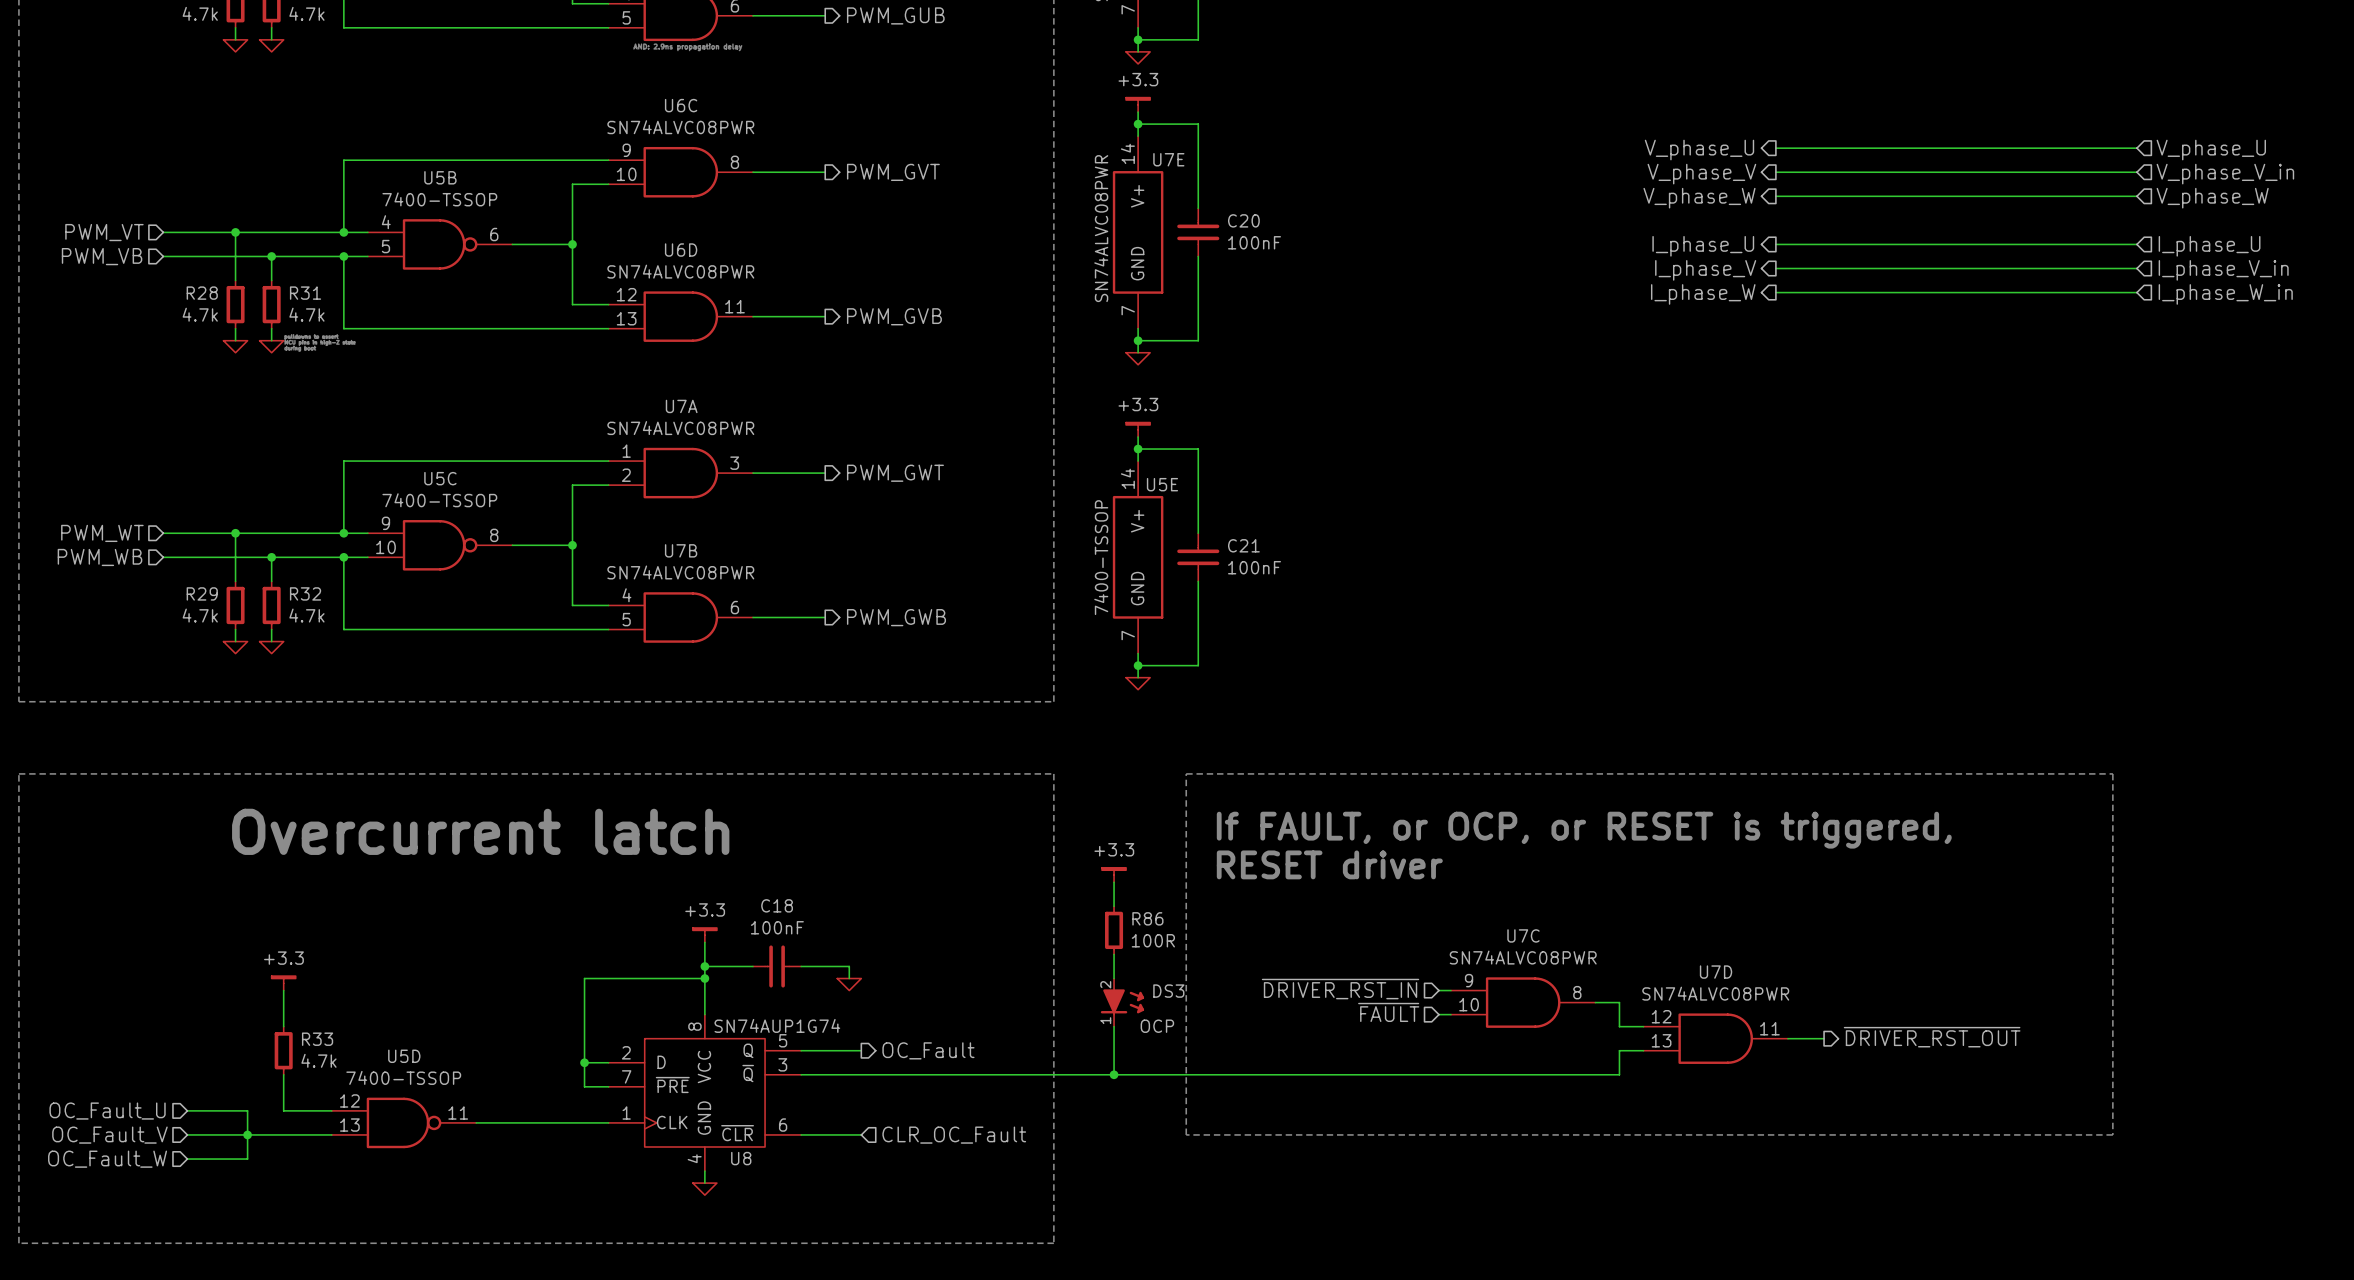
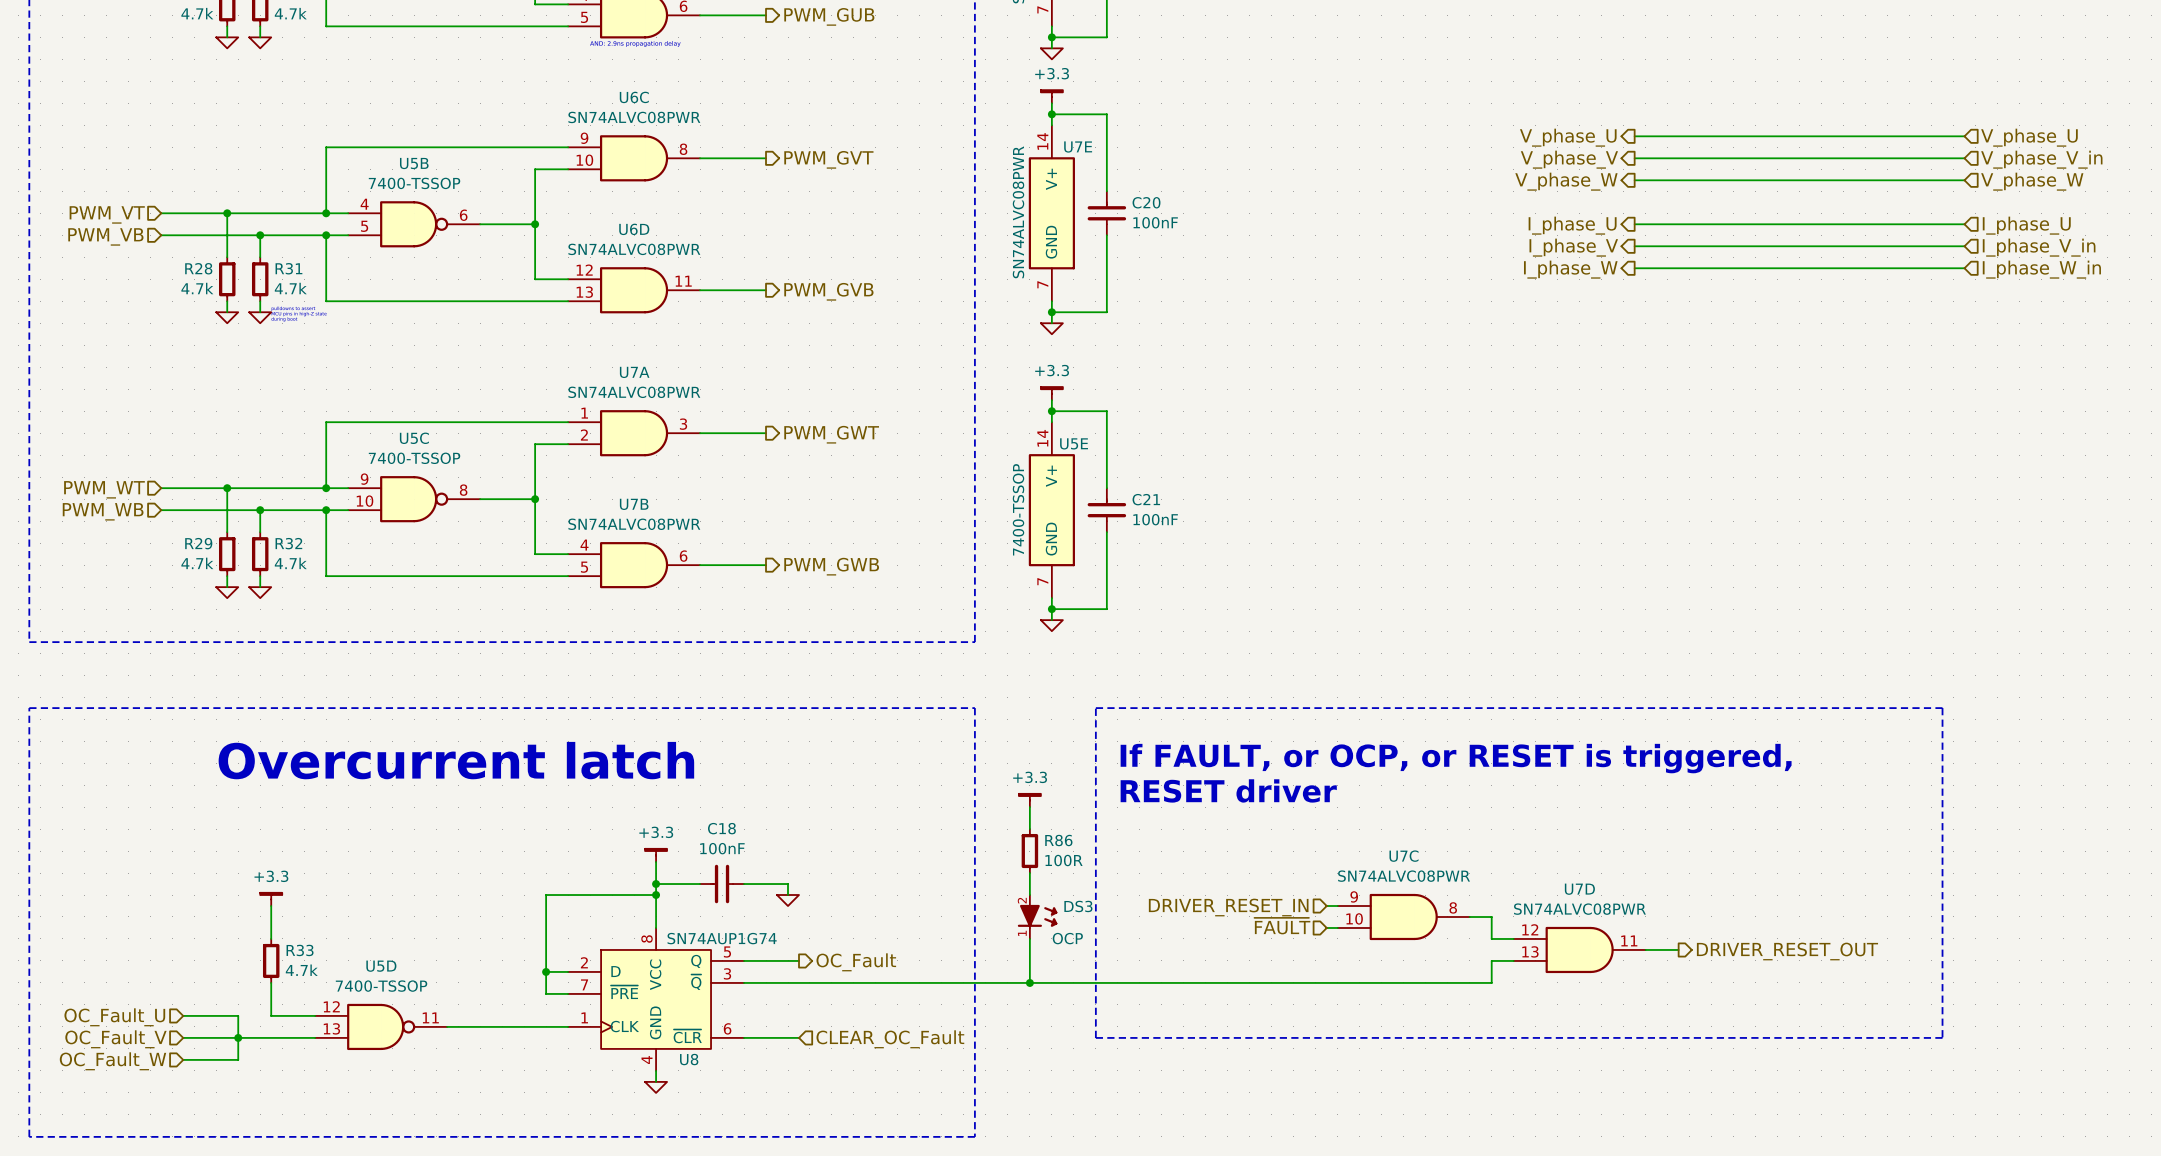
hierarchical label: ~{DRIVER_RST_IN} (1340, 989) -> DRIVER_RESET_IN (1228, 907)
hierarchical label: ~{DRIVER_RST_OUT} (1932, 1037) -> DRIVER_RESET_OUT (1787, 951)
hierarchical label: CLR_OC_Fault (954, 1135) -> CLEAR_OC_Fault (890, 1039)

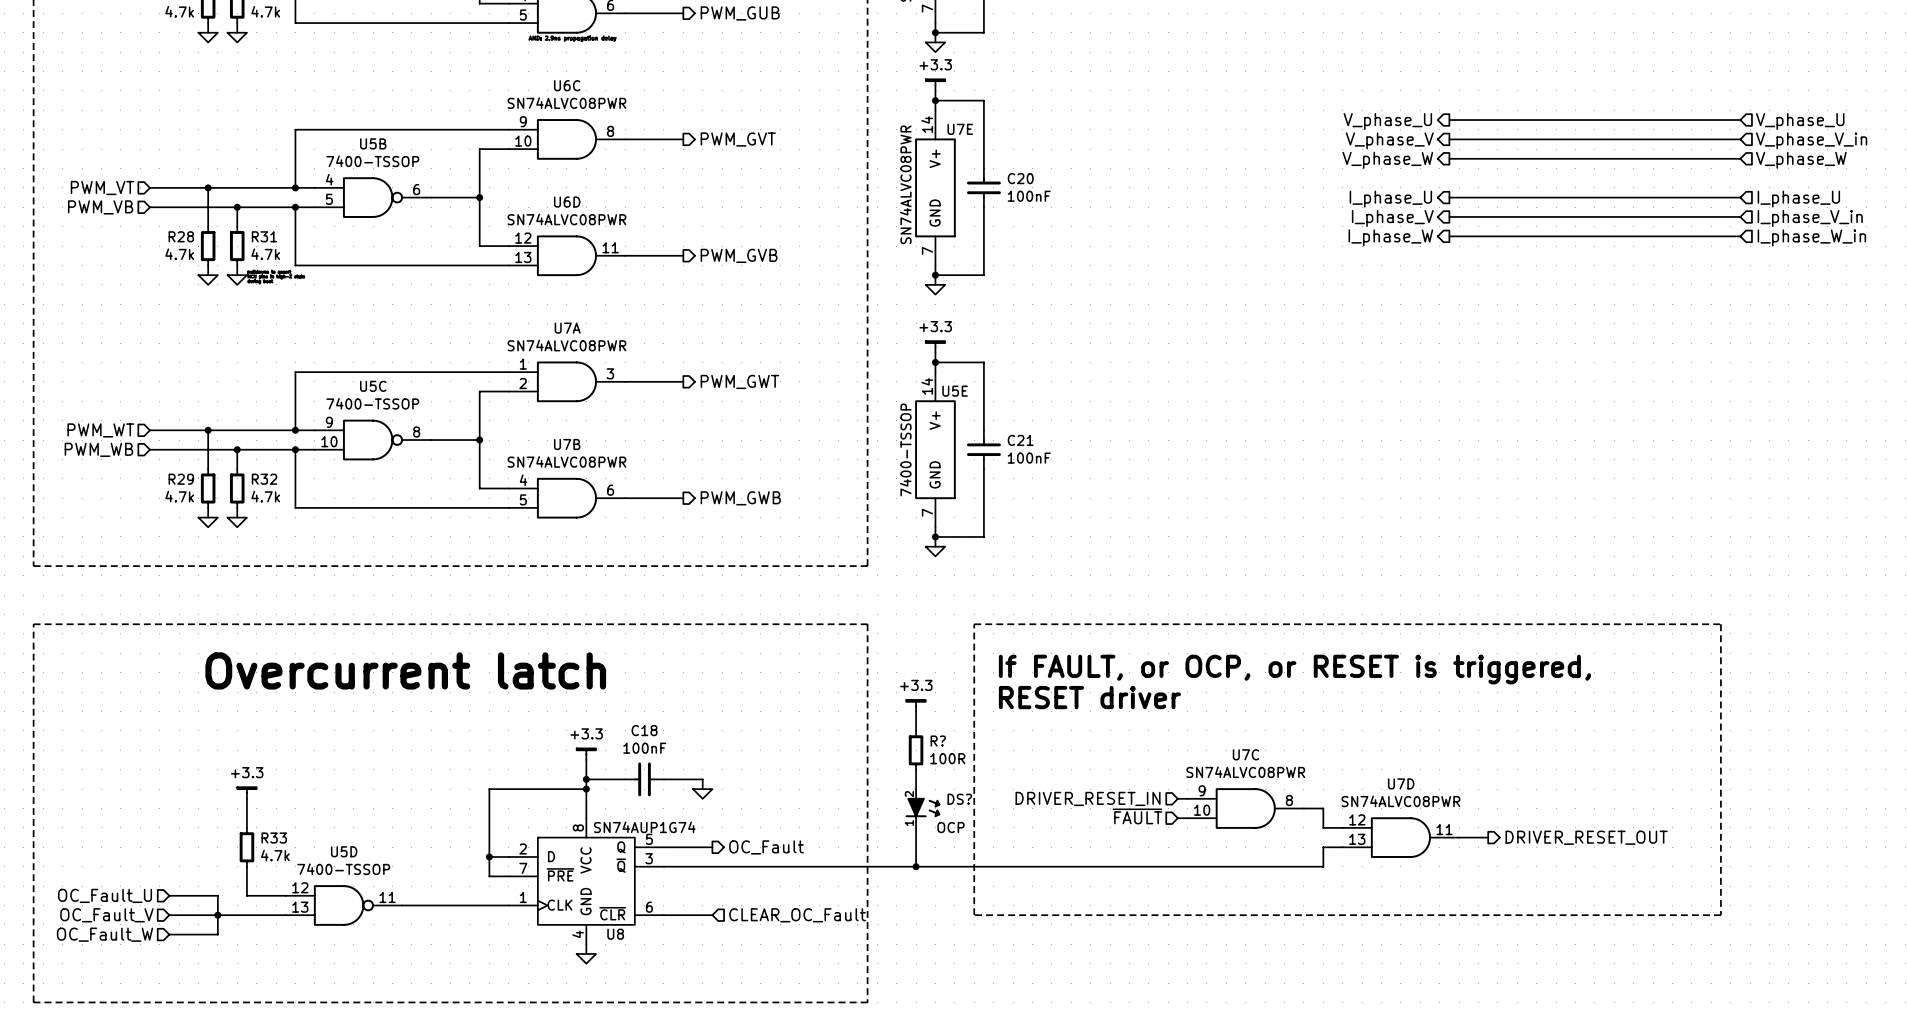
R86 name: R86 (1058, 840) -> R? (938, 741)
DS3 name: DS3 (1078, 906) -> DS? (959, 799)

